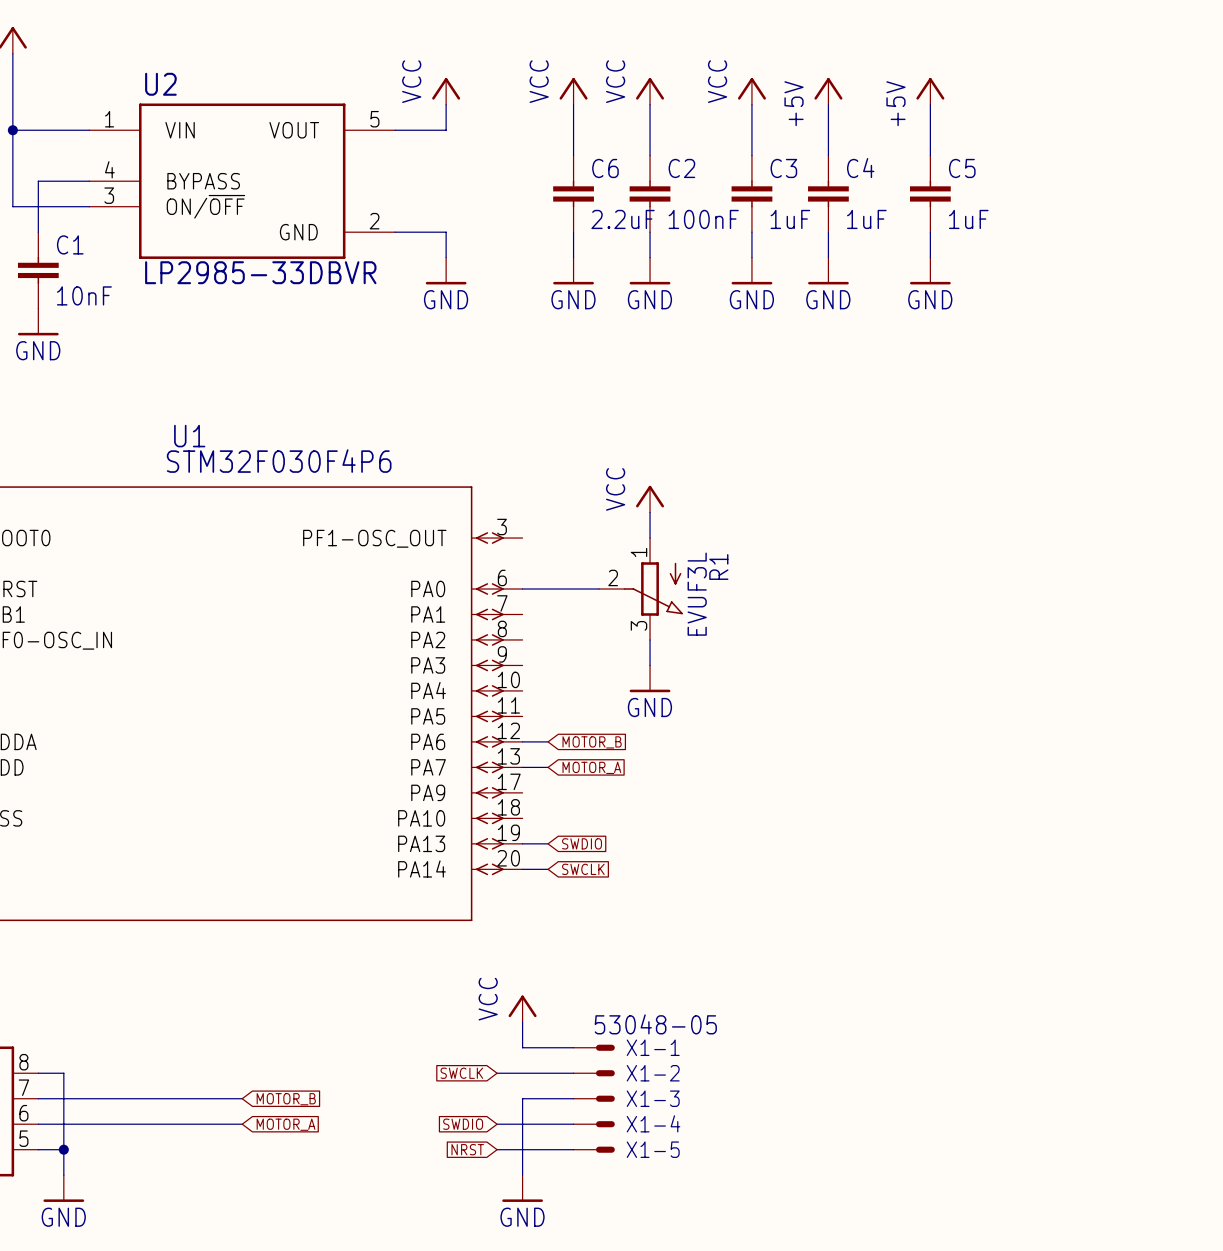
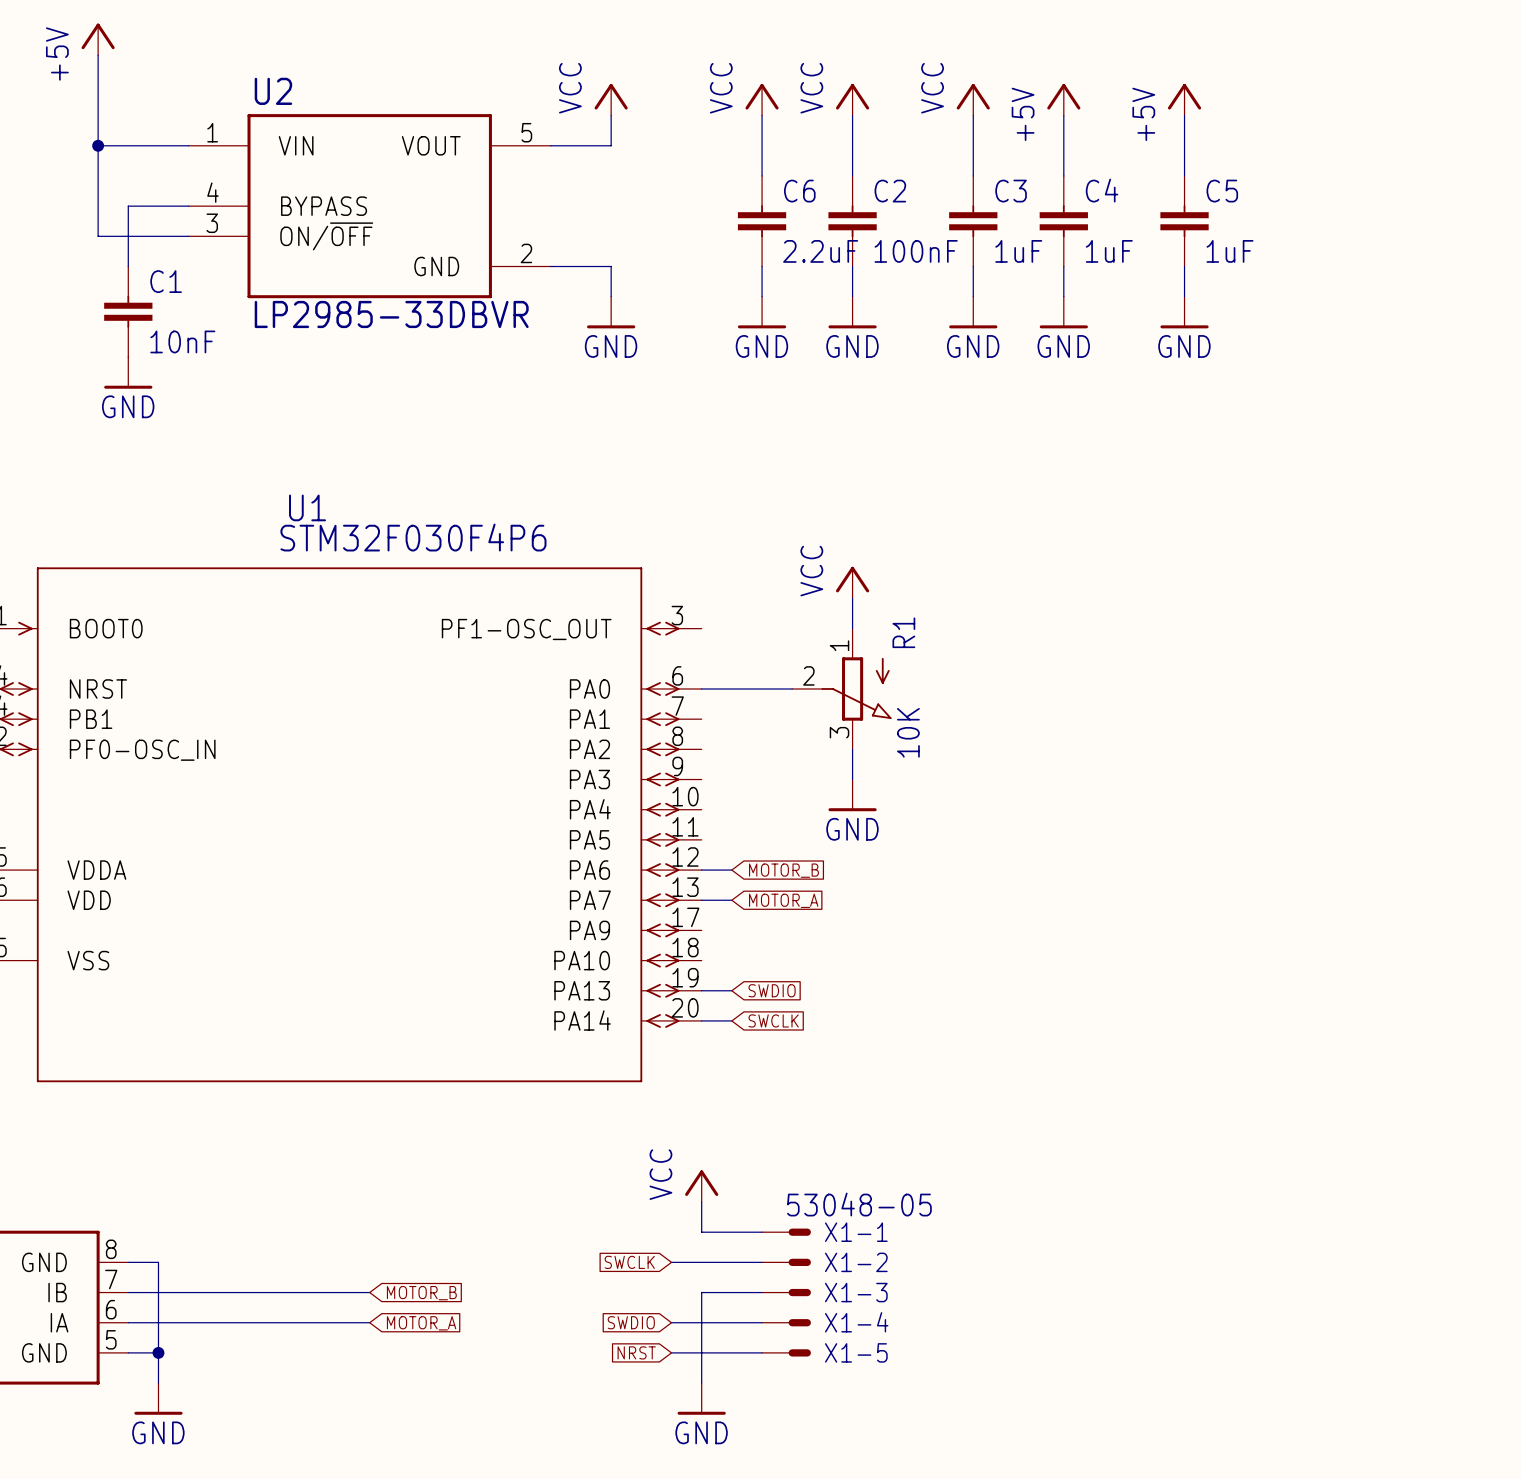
R1 name position: R1 (718, 567) -> R1 (903, 632)
R1 value: EVUF3L (697, 594) -> 10K (908, 732)

